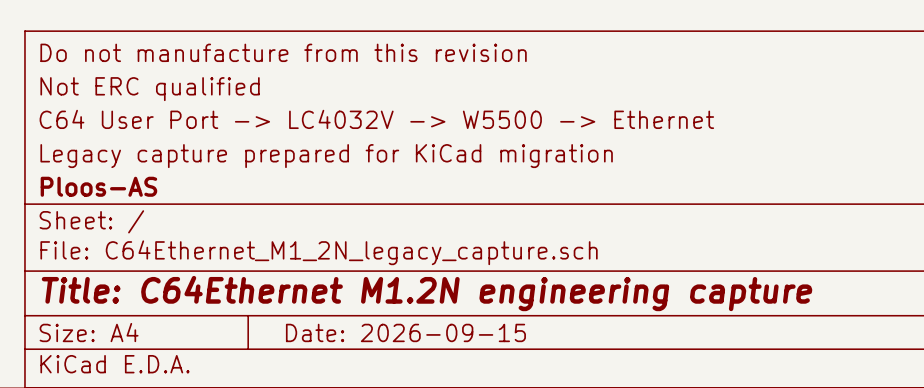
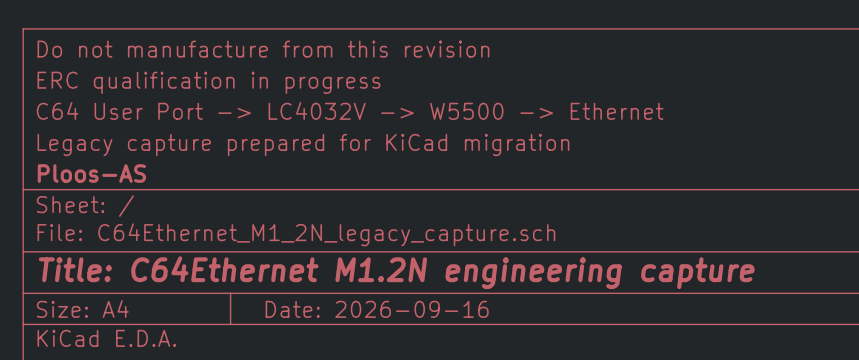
title block: Not ERC qualified (150, 89) -> ERC qualification in progress (209, 82)
title block: Date: 2026-09-15 (405, 332) -> Date: 2026-09-16 (377, 309)

